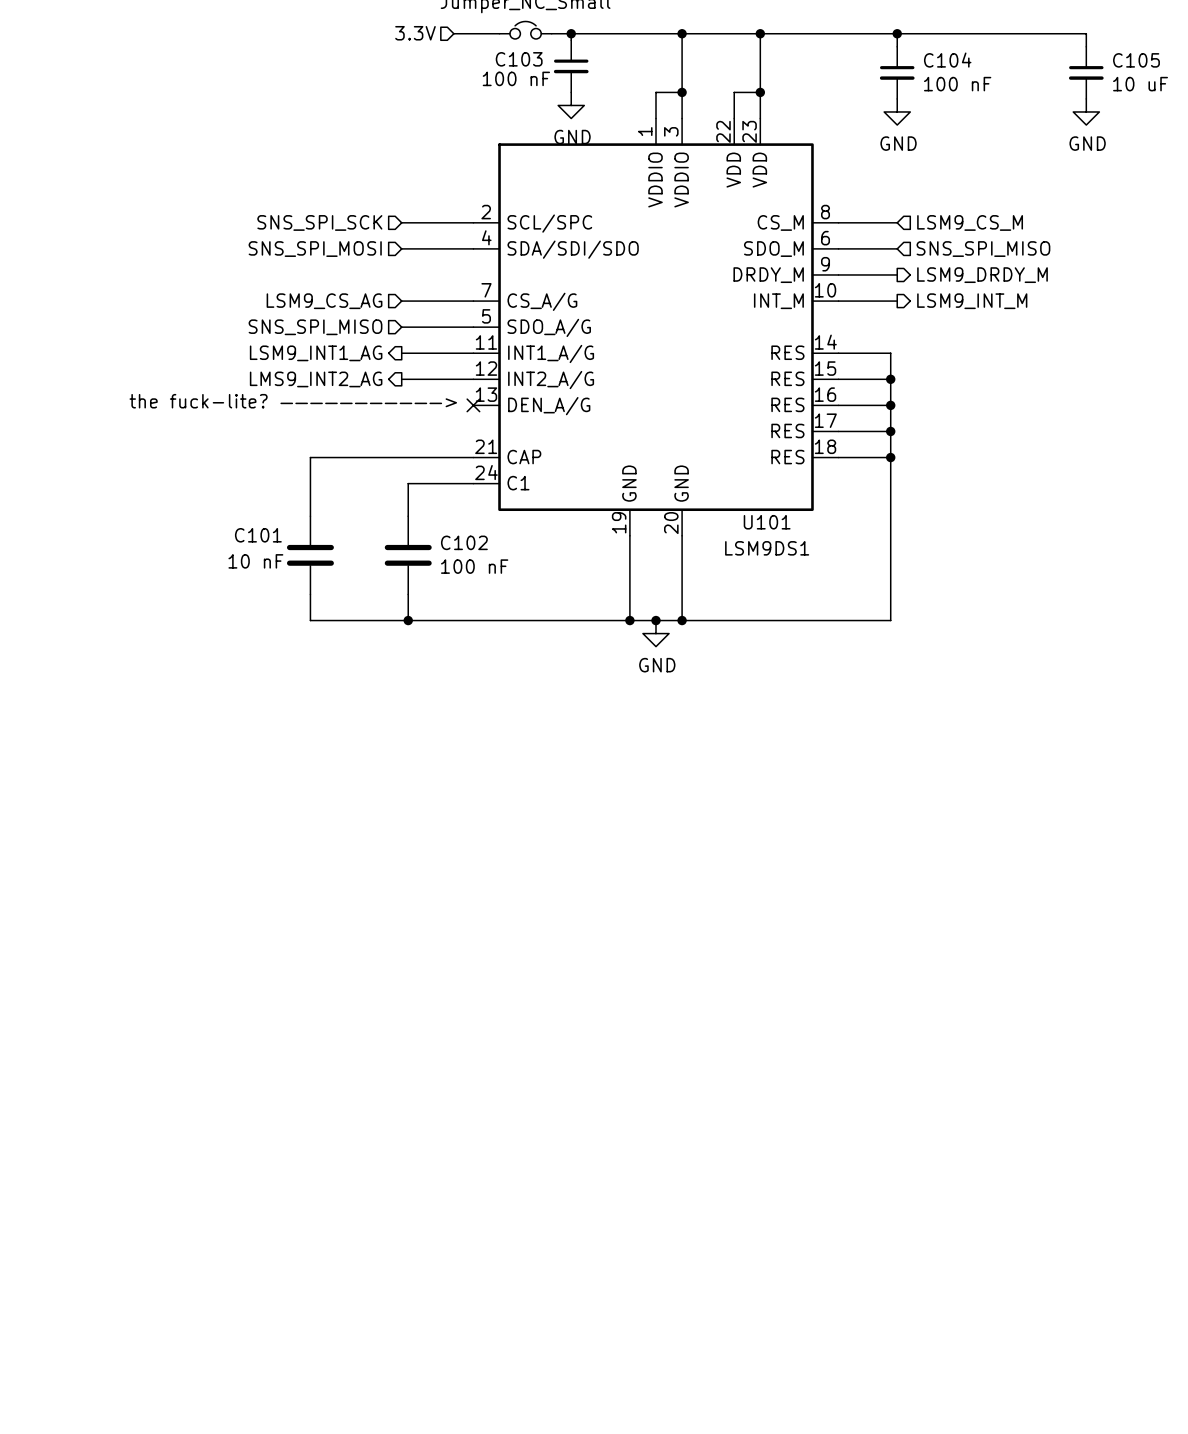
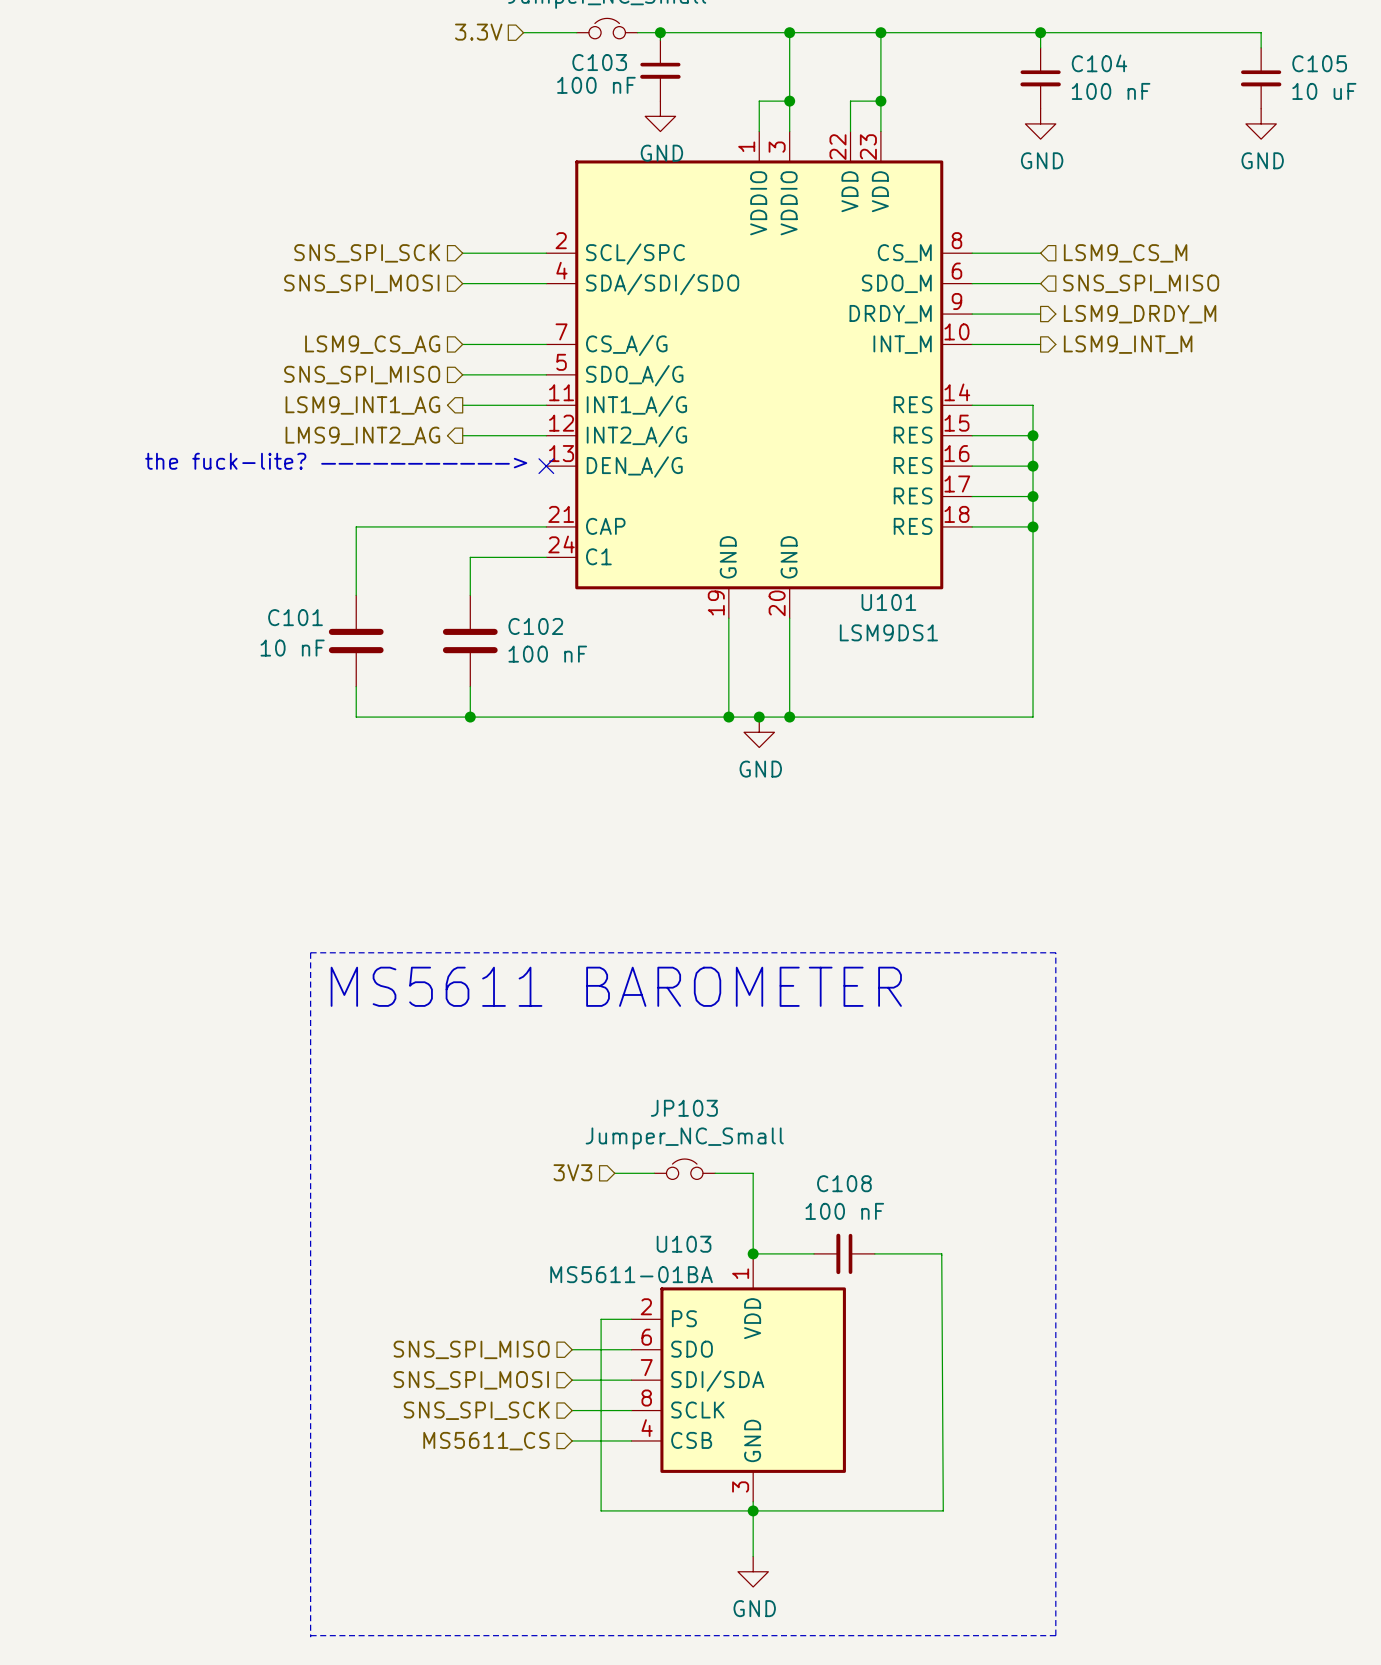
text: none -> MS5611 BAROMETER (616, 986)
JP103: none -> Jumper_NC_Small (684, 1169)
hierarchical label: none -> 3V3 (572, 1172)
wire: none -> (614, 1173) (654, 1173)
wire: none -> (715, 1173) (753, 1173) (753, 1258)
wire: none -> (753, 1253) (814, 1253)
junction: none -> (753, 1253)
C108: none -> 100 nF (844, 1253)
wire: none -> (874, 1253) (941, 1253) (943, 1510) (601, 1510) (601, 1319) (631, 1319)
hierarchical label: none -> SNS_SPI_MISO (471, 1349)
wire: none -> (572, 1349) (631, 1349)
hierarchical label: none -> SNS_SPI_MOSI (471, 1380)
wire: none -> (572, 1380) (631, 1380)
U103: none -> MS5611-01BA (738, 1380)
hierarchical label: none -> SNS_SPI_SCK (476, 1410)
wire: none -> (572, 1410) (631, 1410)
hierarchical label: none -> MS5611_CS (486, 1441)
wire: none -> (572, 1440) (631, 1440)
wire: none -> (753, 1501) (753, 1556)
junction: none -> (753, 1510)
power symbol: none -> GND (753, 1571)
line: none -> (310, 1635) (1055, 1635) (1055, 952) (310, 952) (310, 1637)

